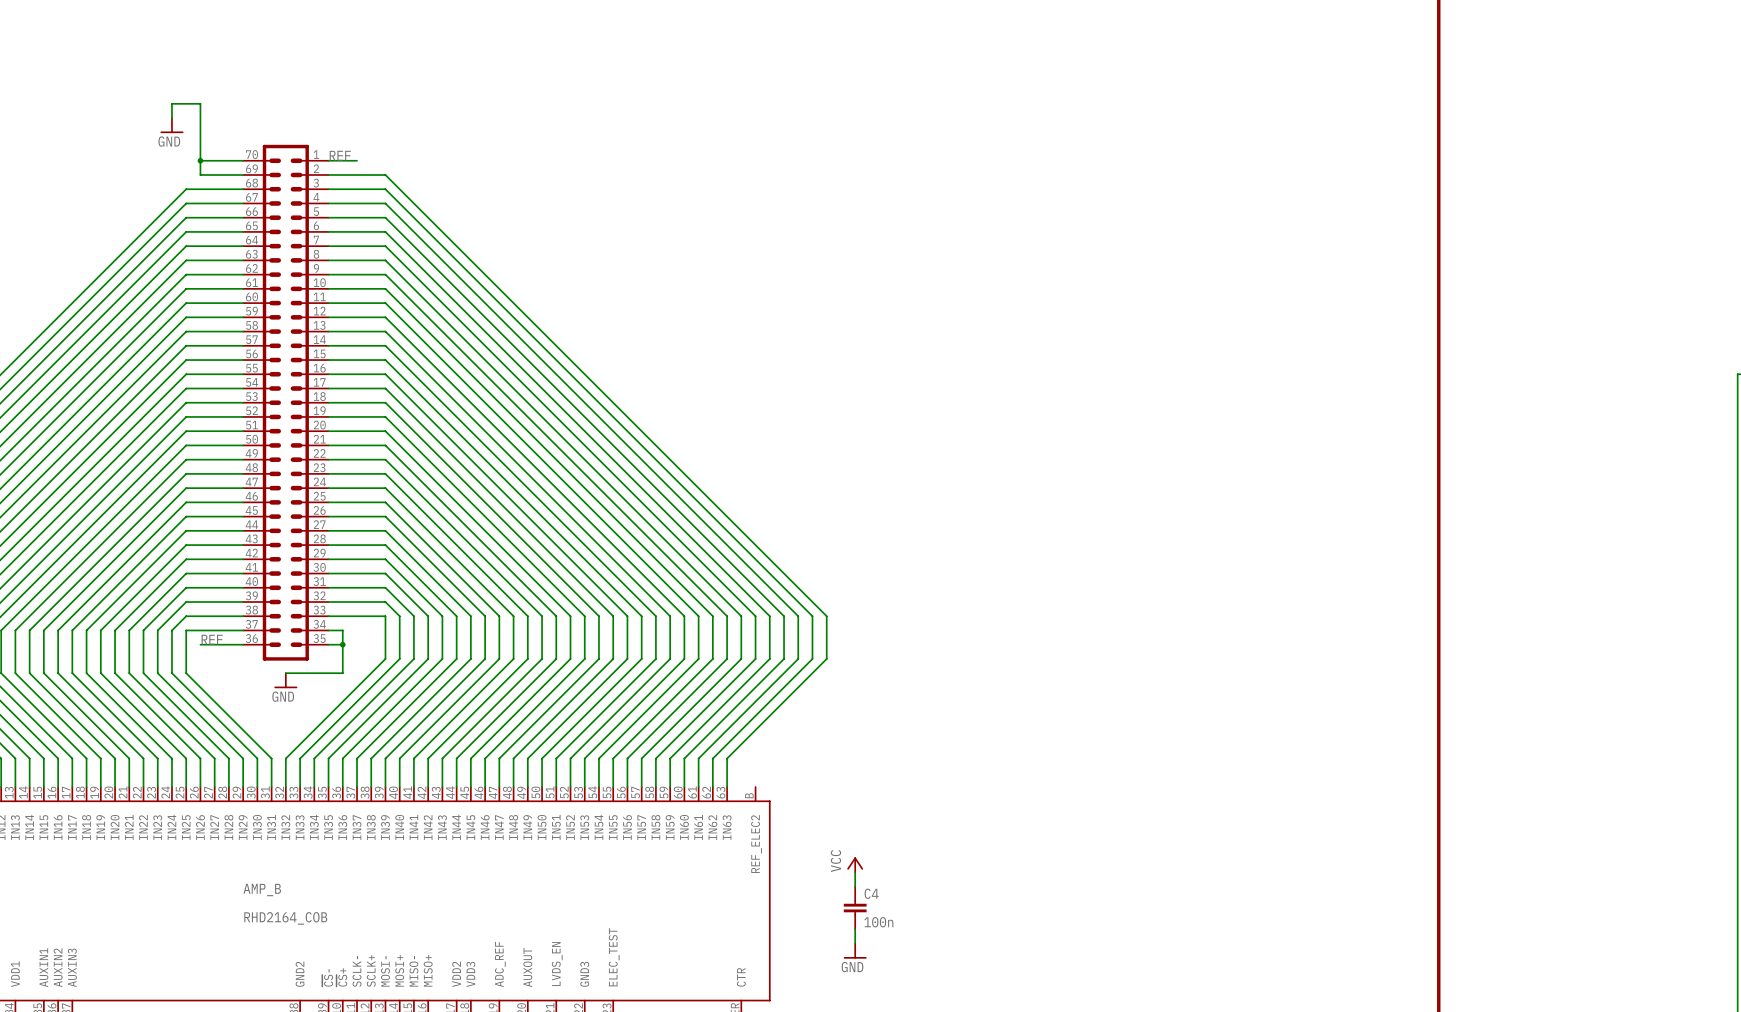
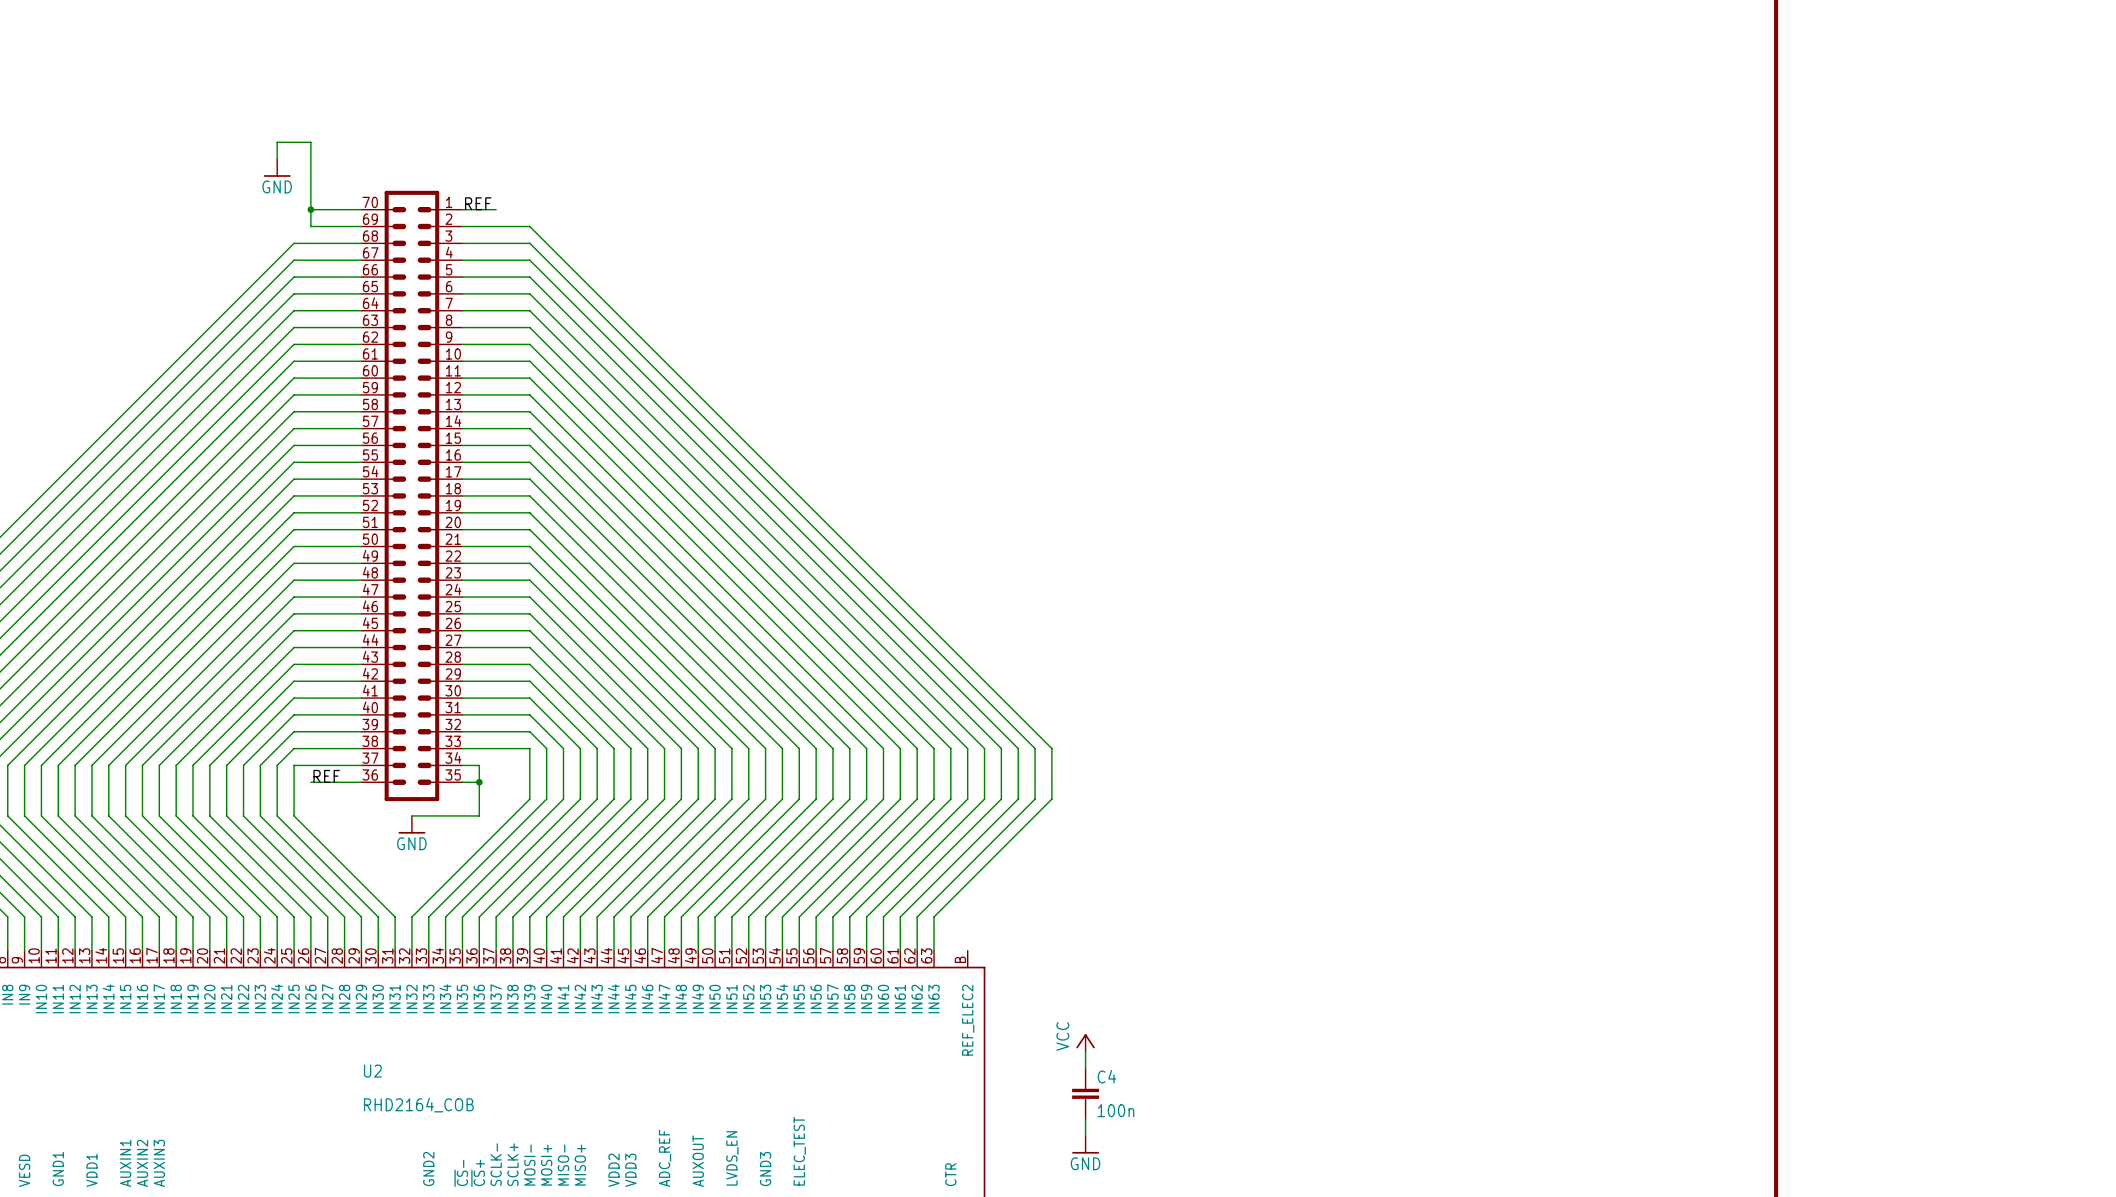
AMP_B name: AMP_B (262, 890) -> U2 (372, 1071)

